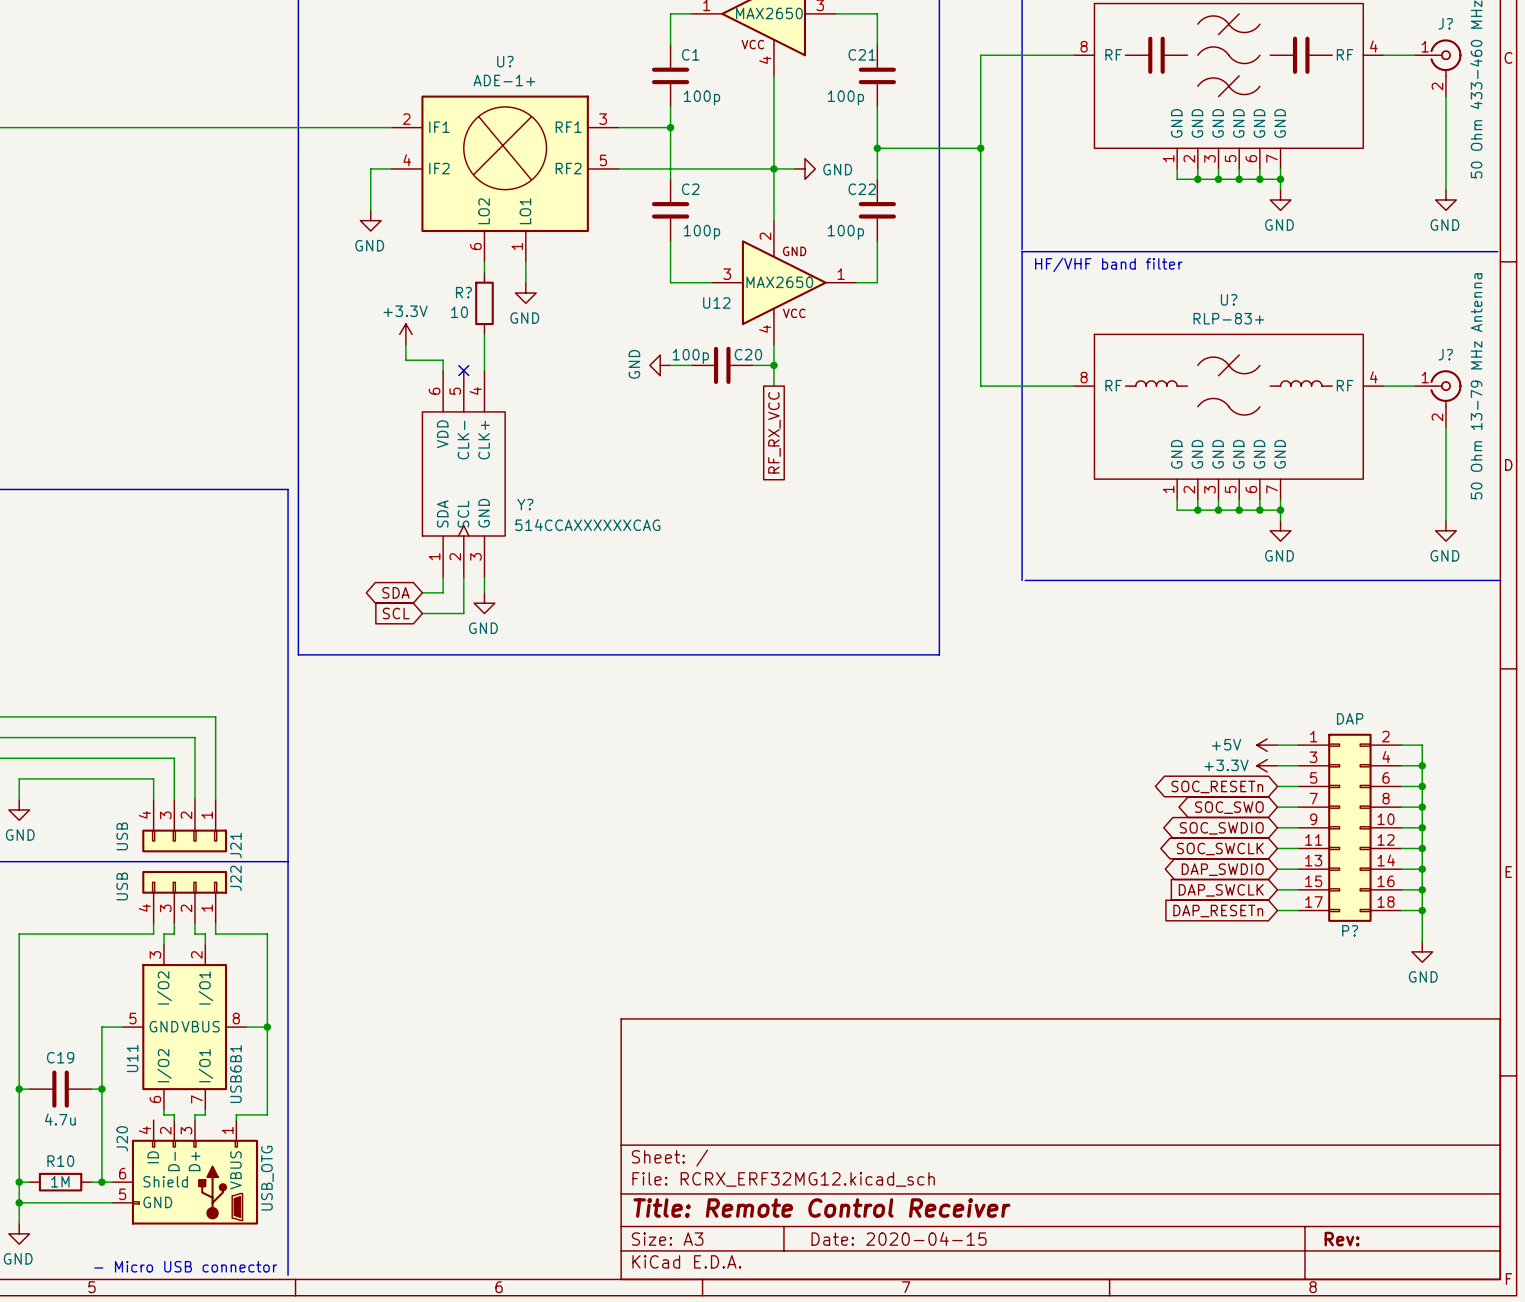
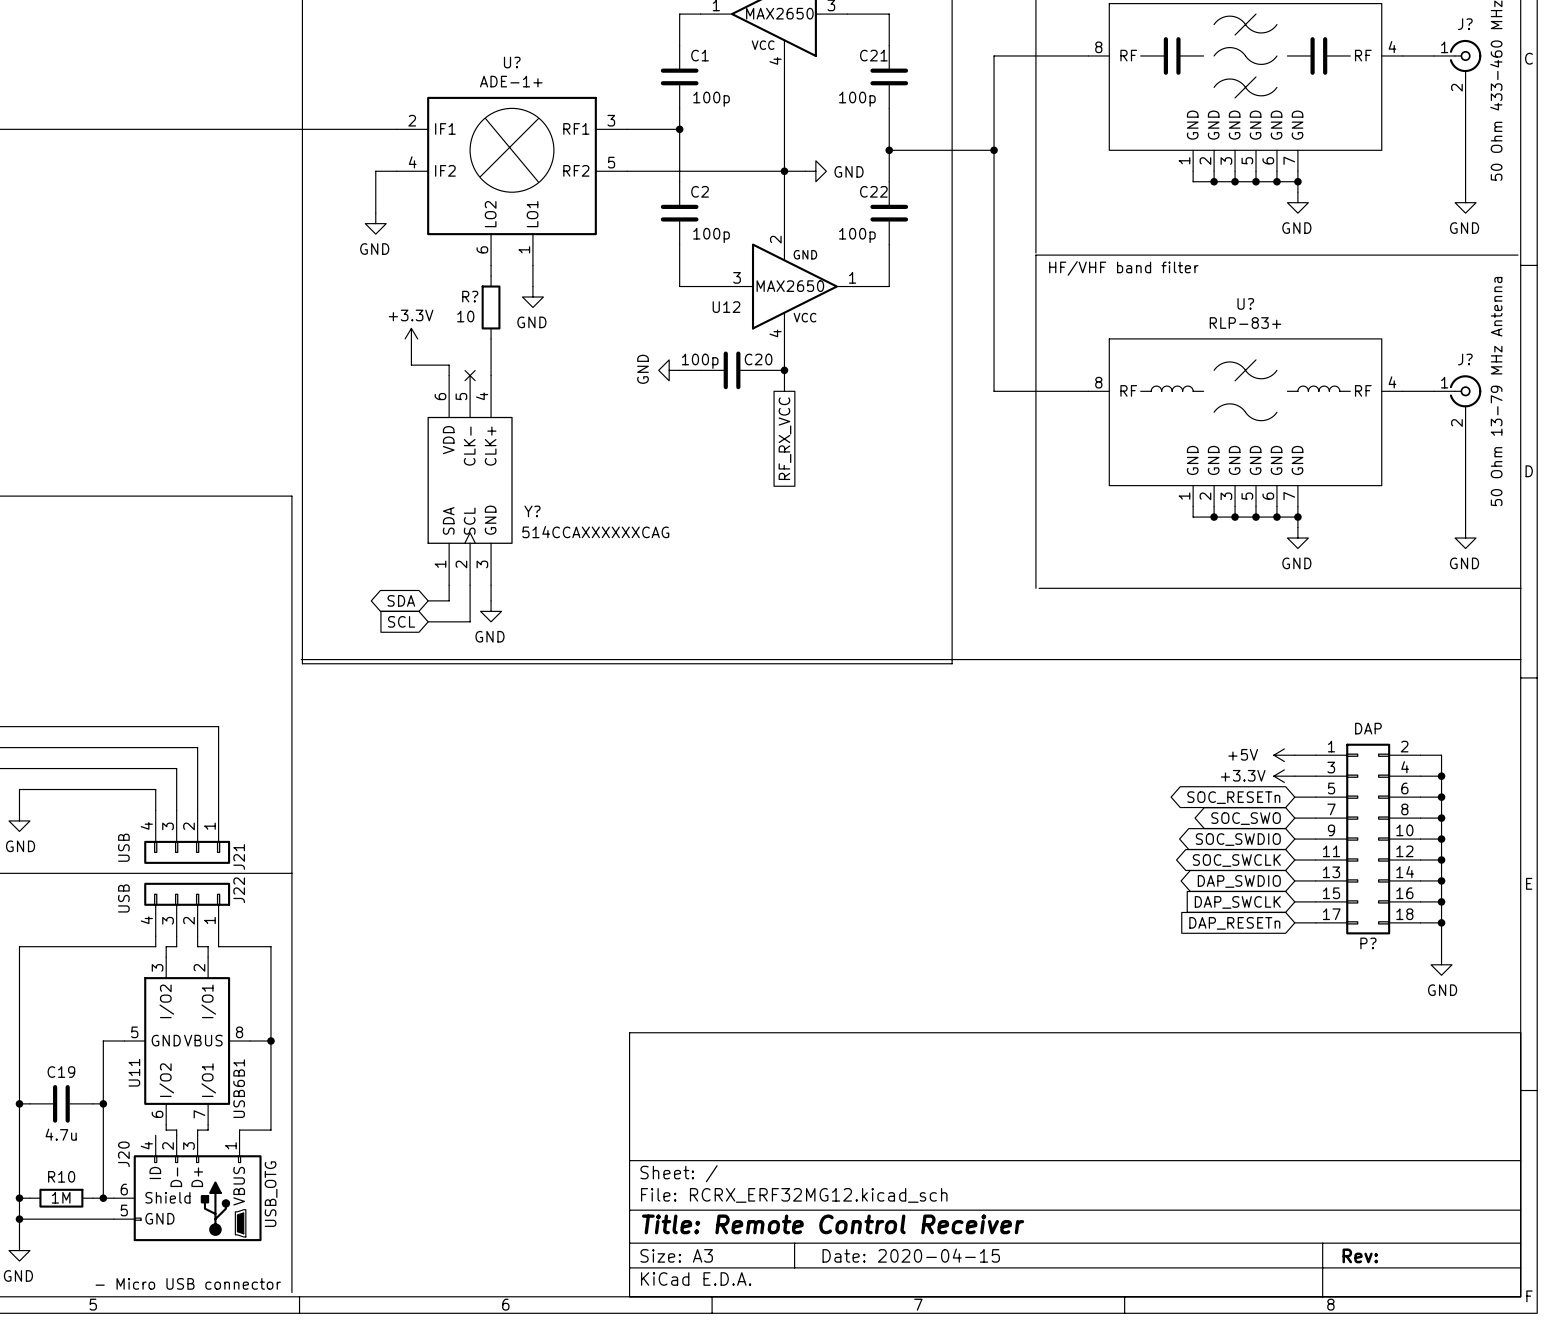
line: none -> (301, 659) (1521, 659)

